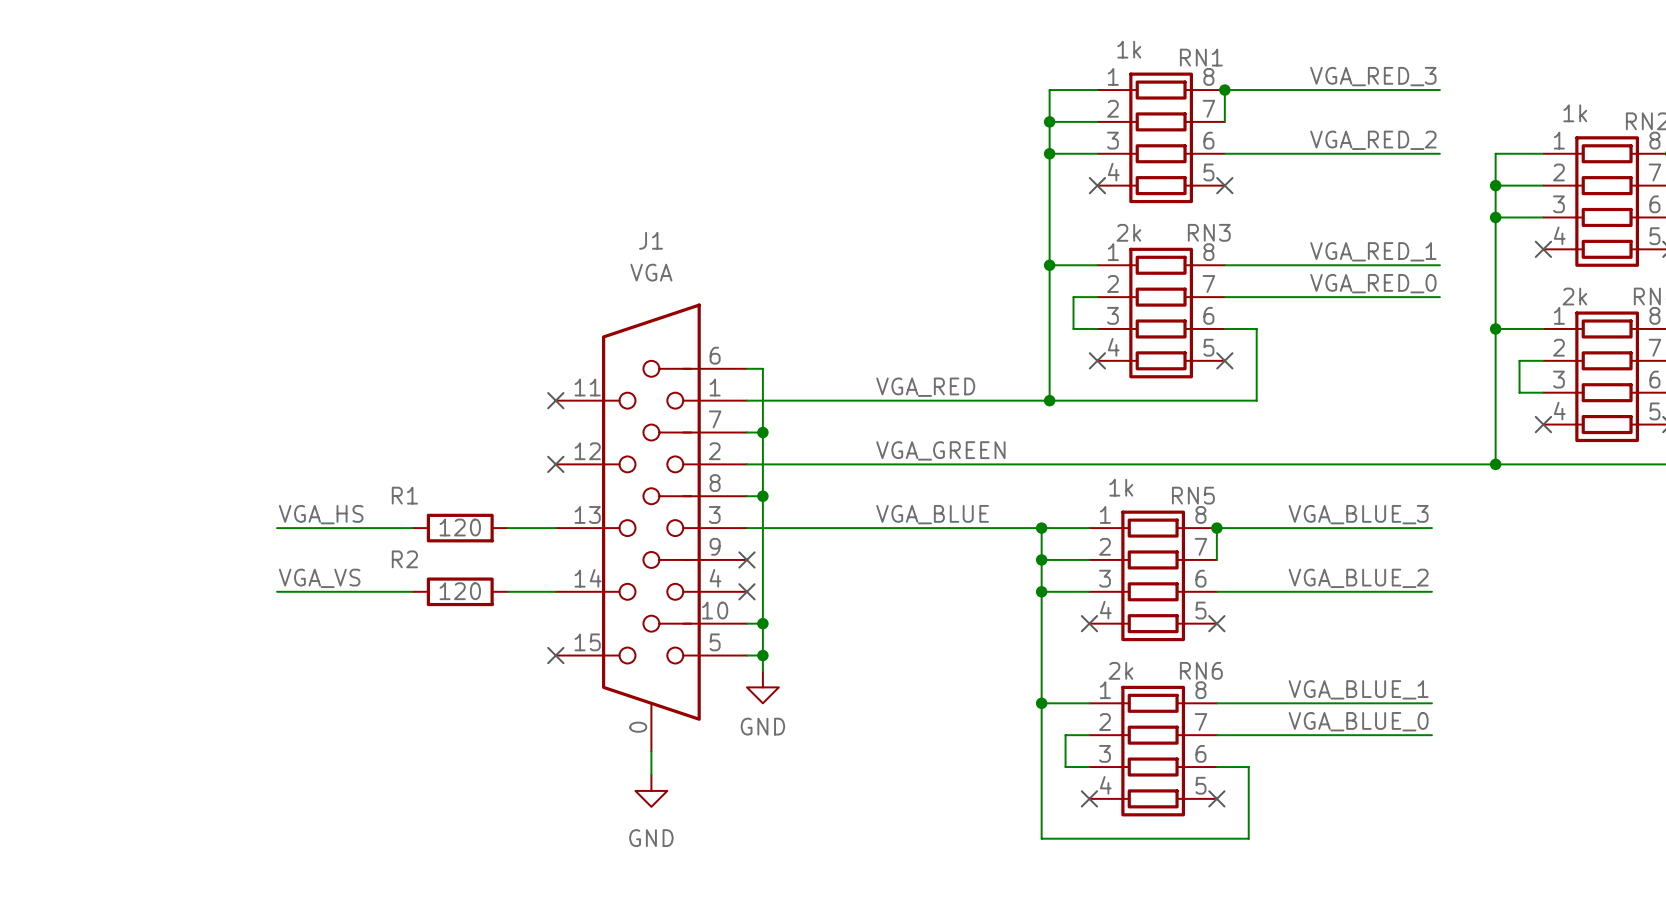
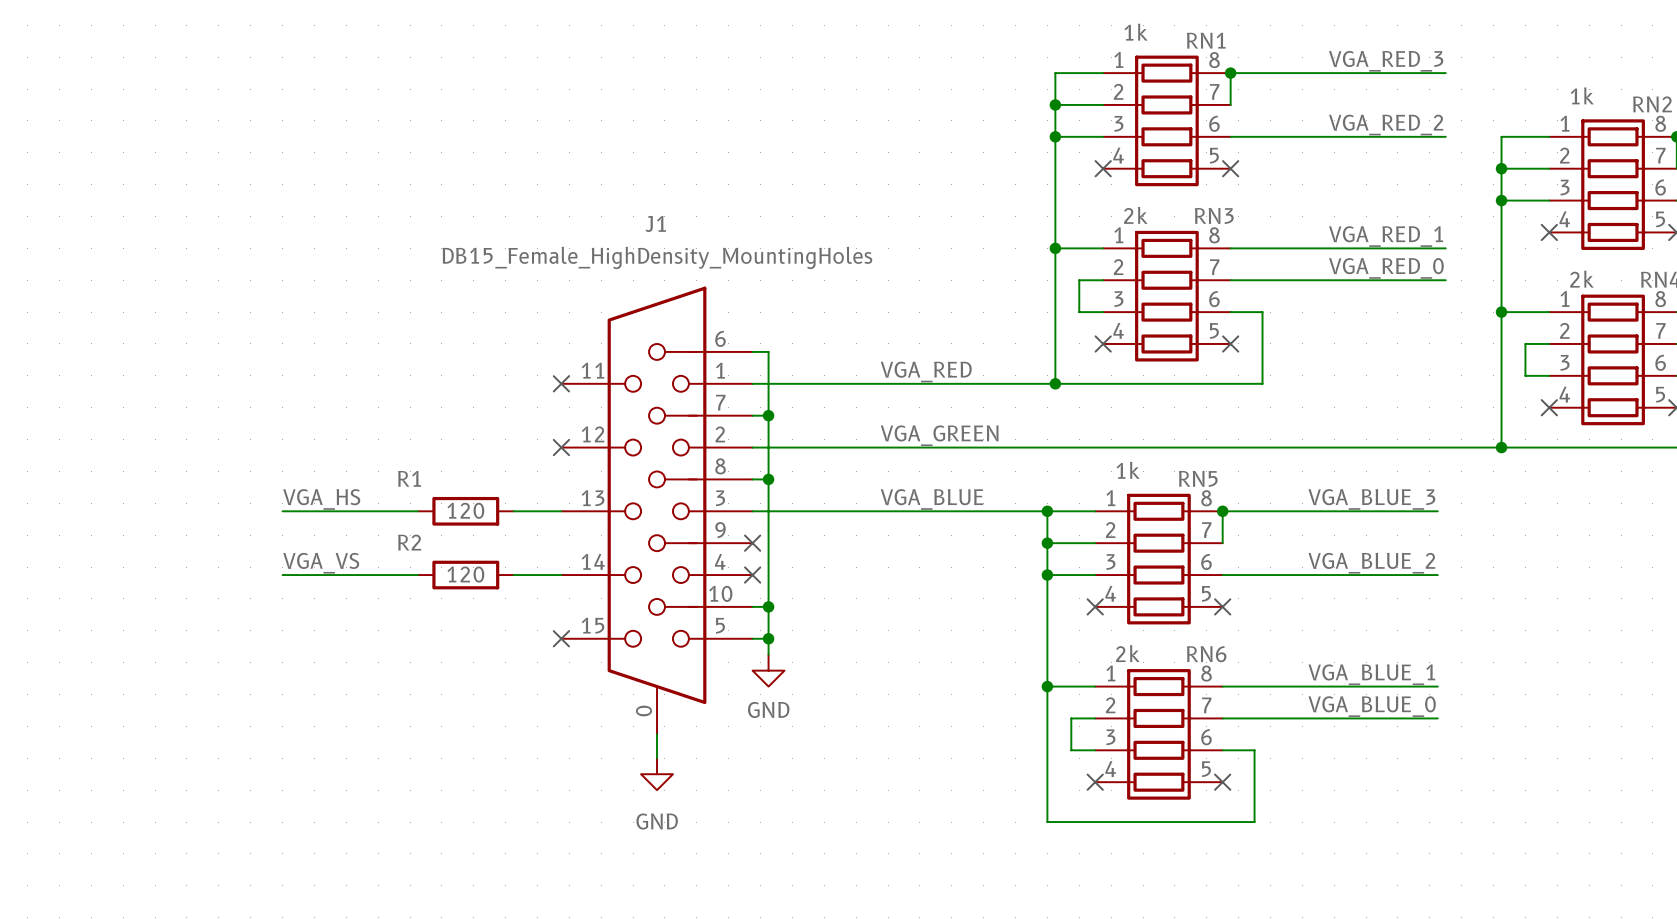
J1 value: VGA (651, 272) -> DB15_Female_HighDensity_MountingHoles (657, 257)

